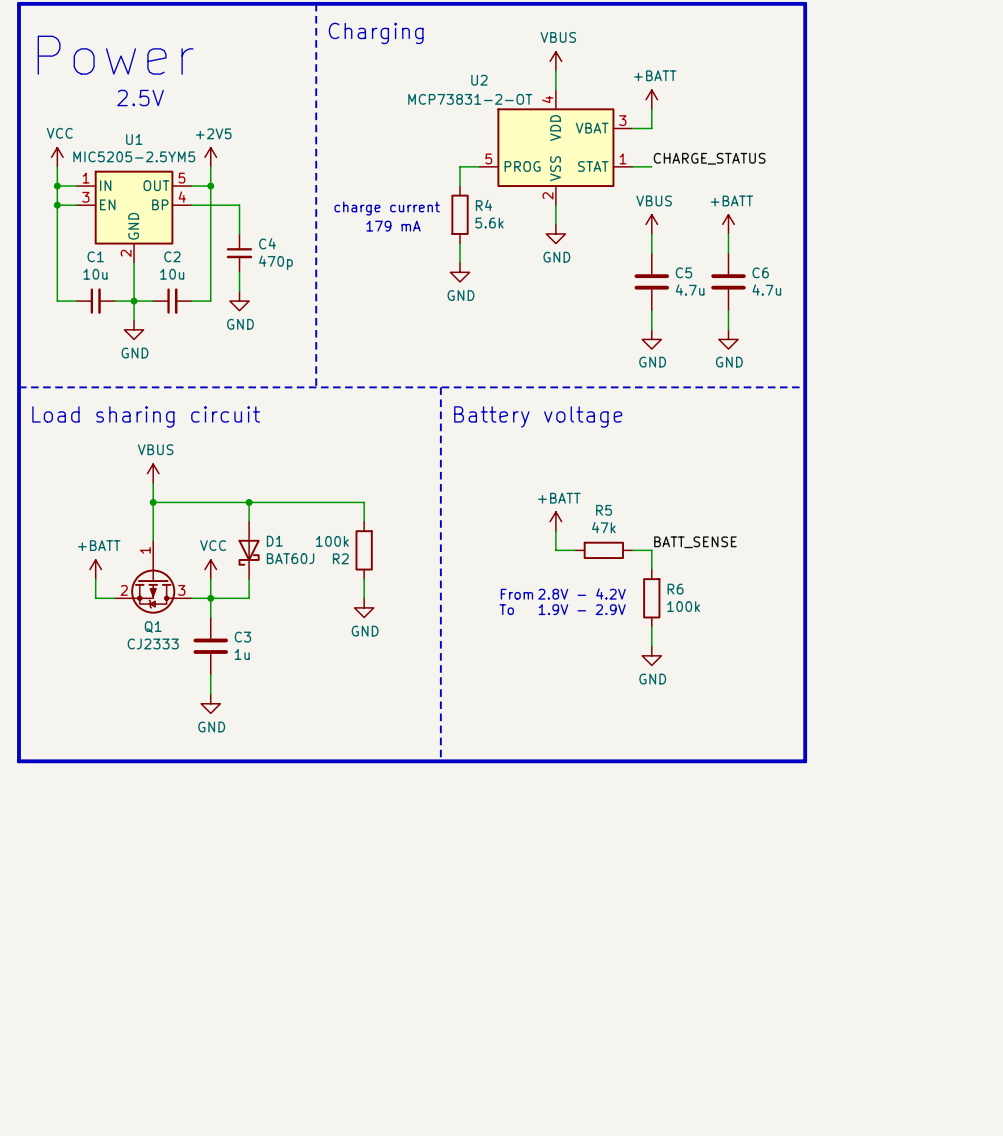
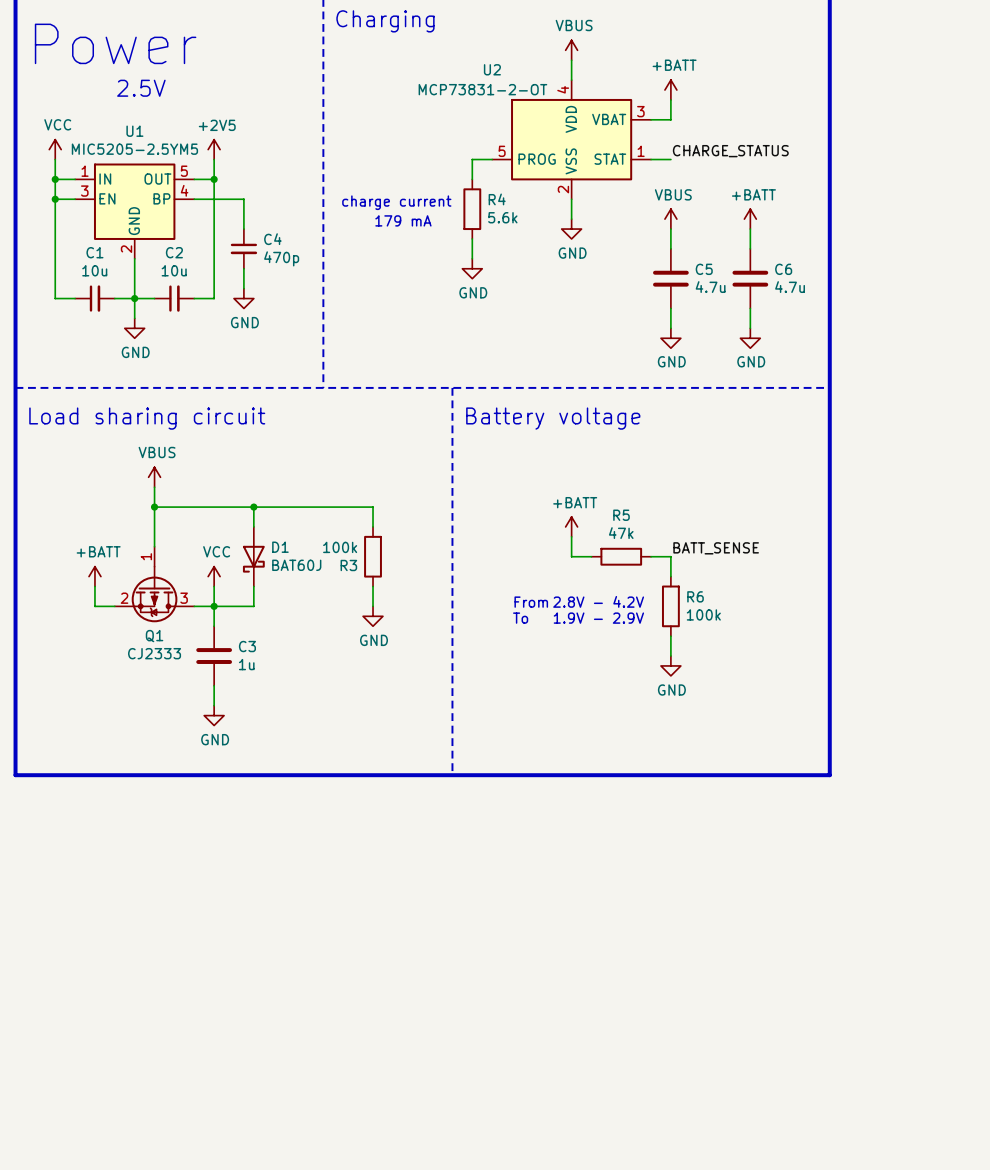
R2 name: R2 (340, 558) -> R3 (348, 565)

